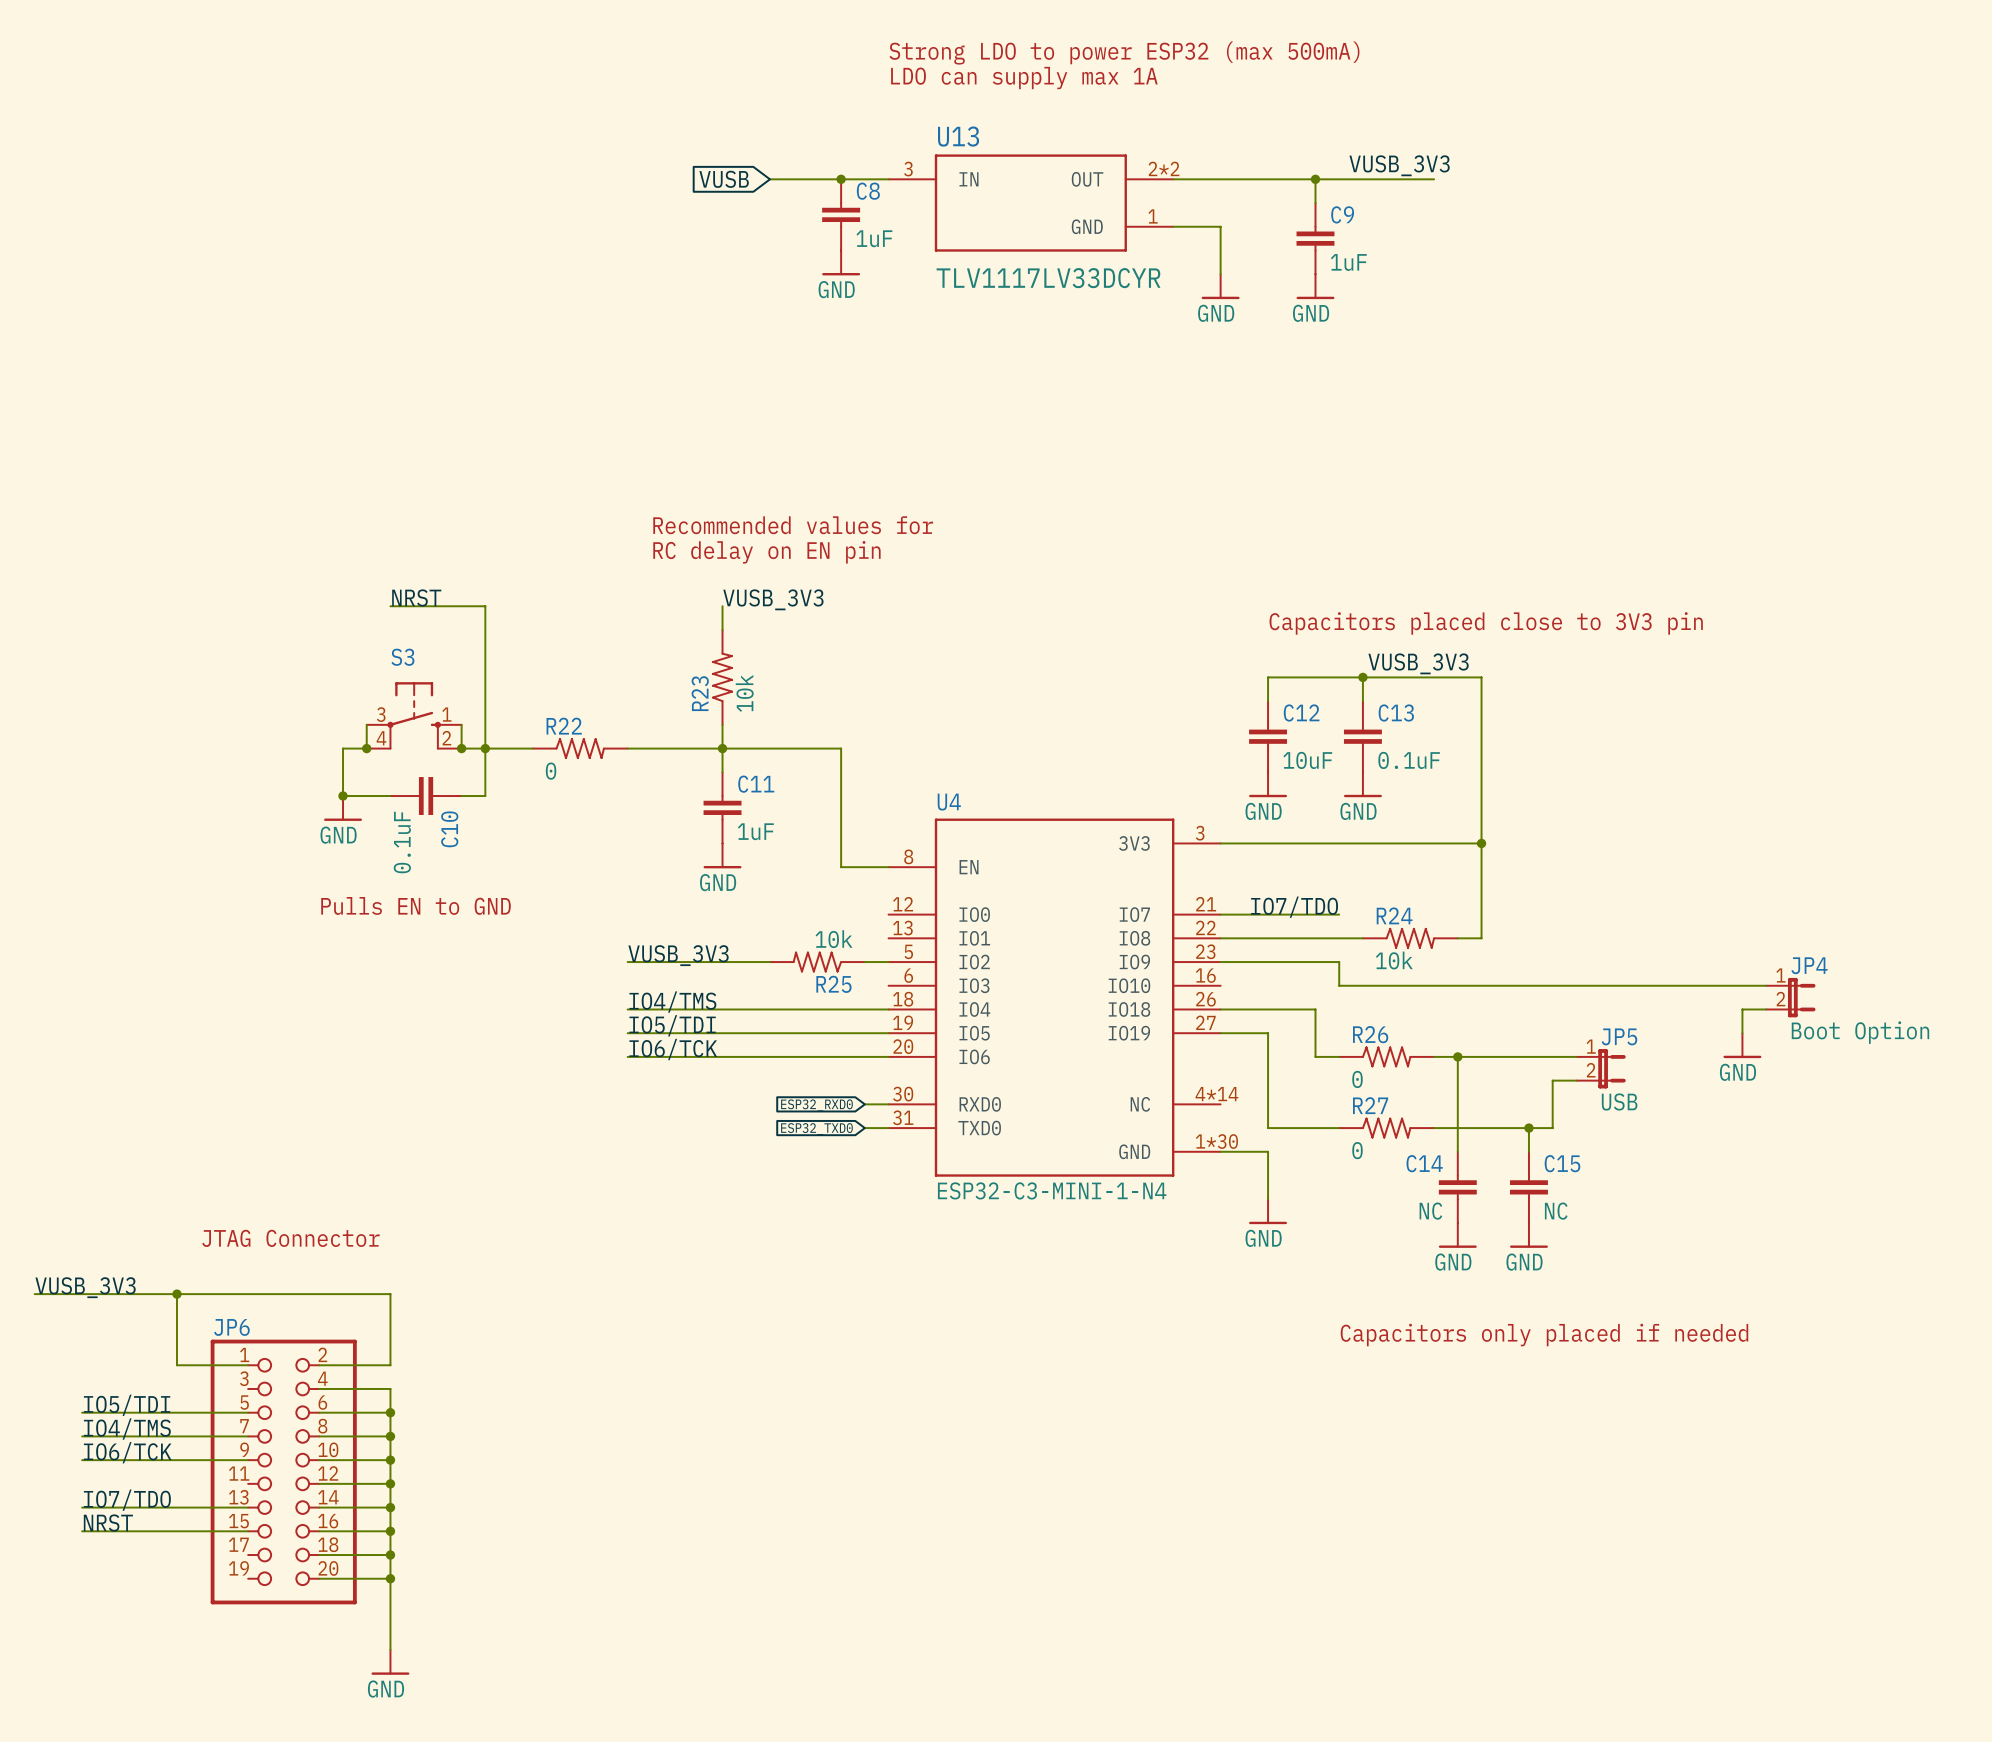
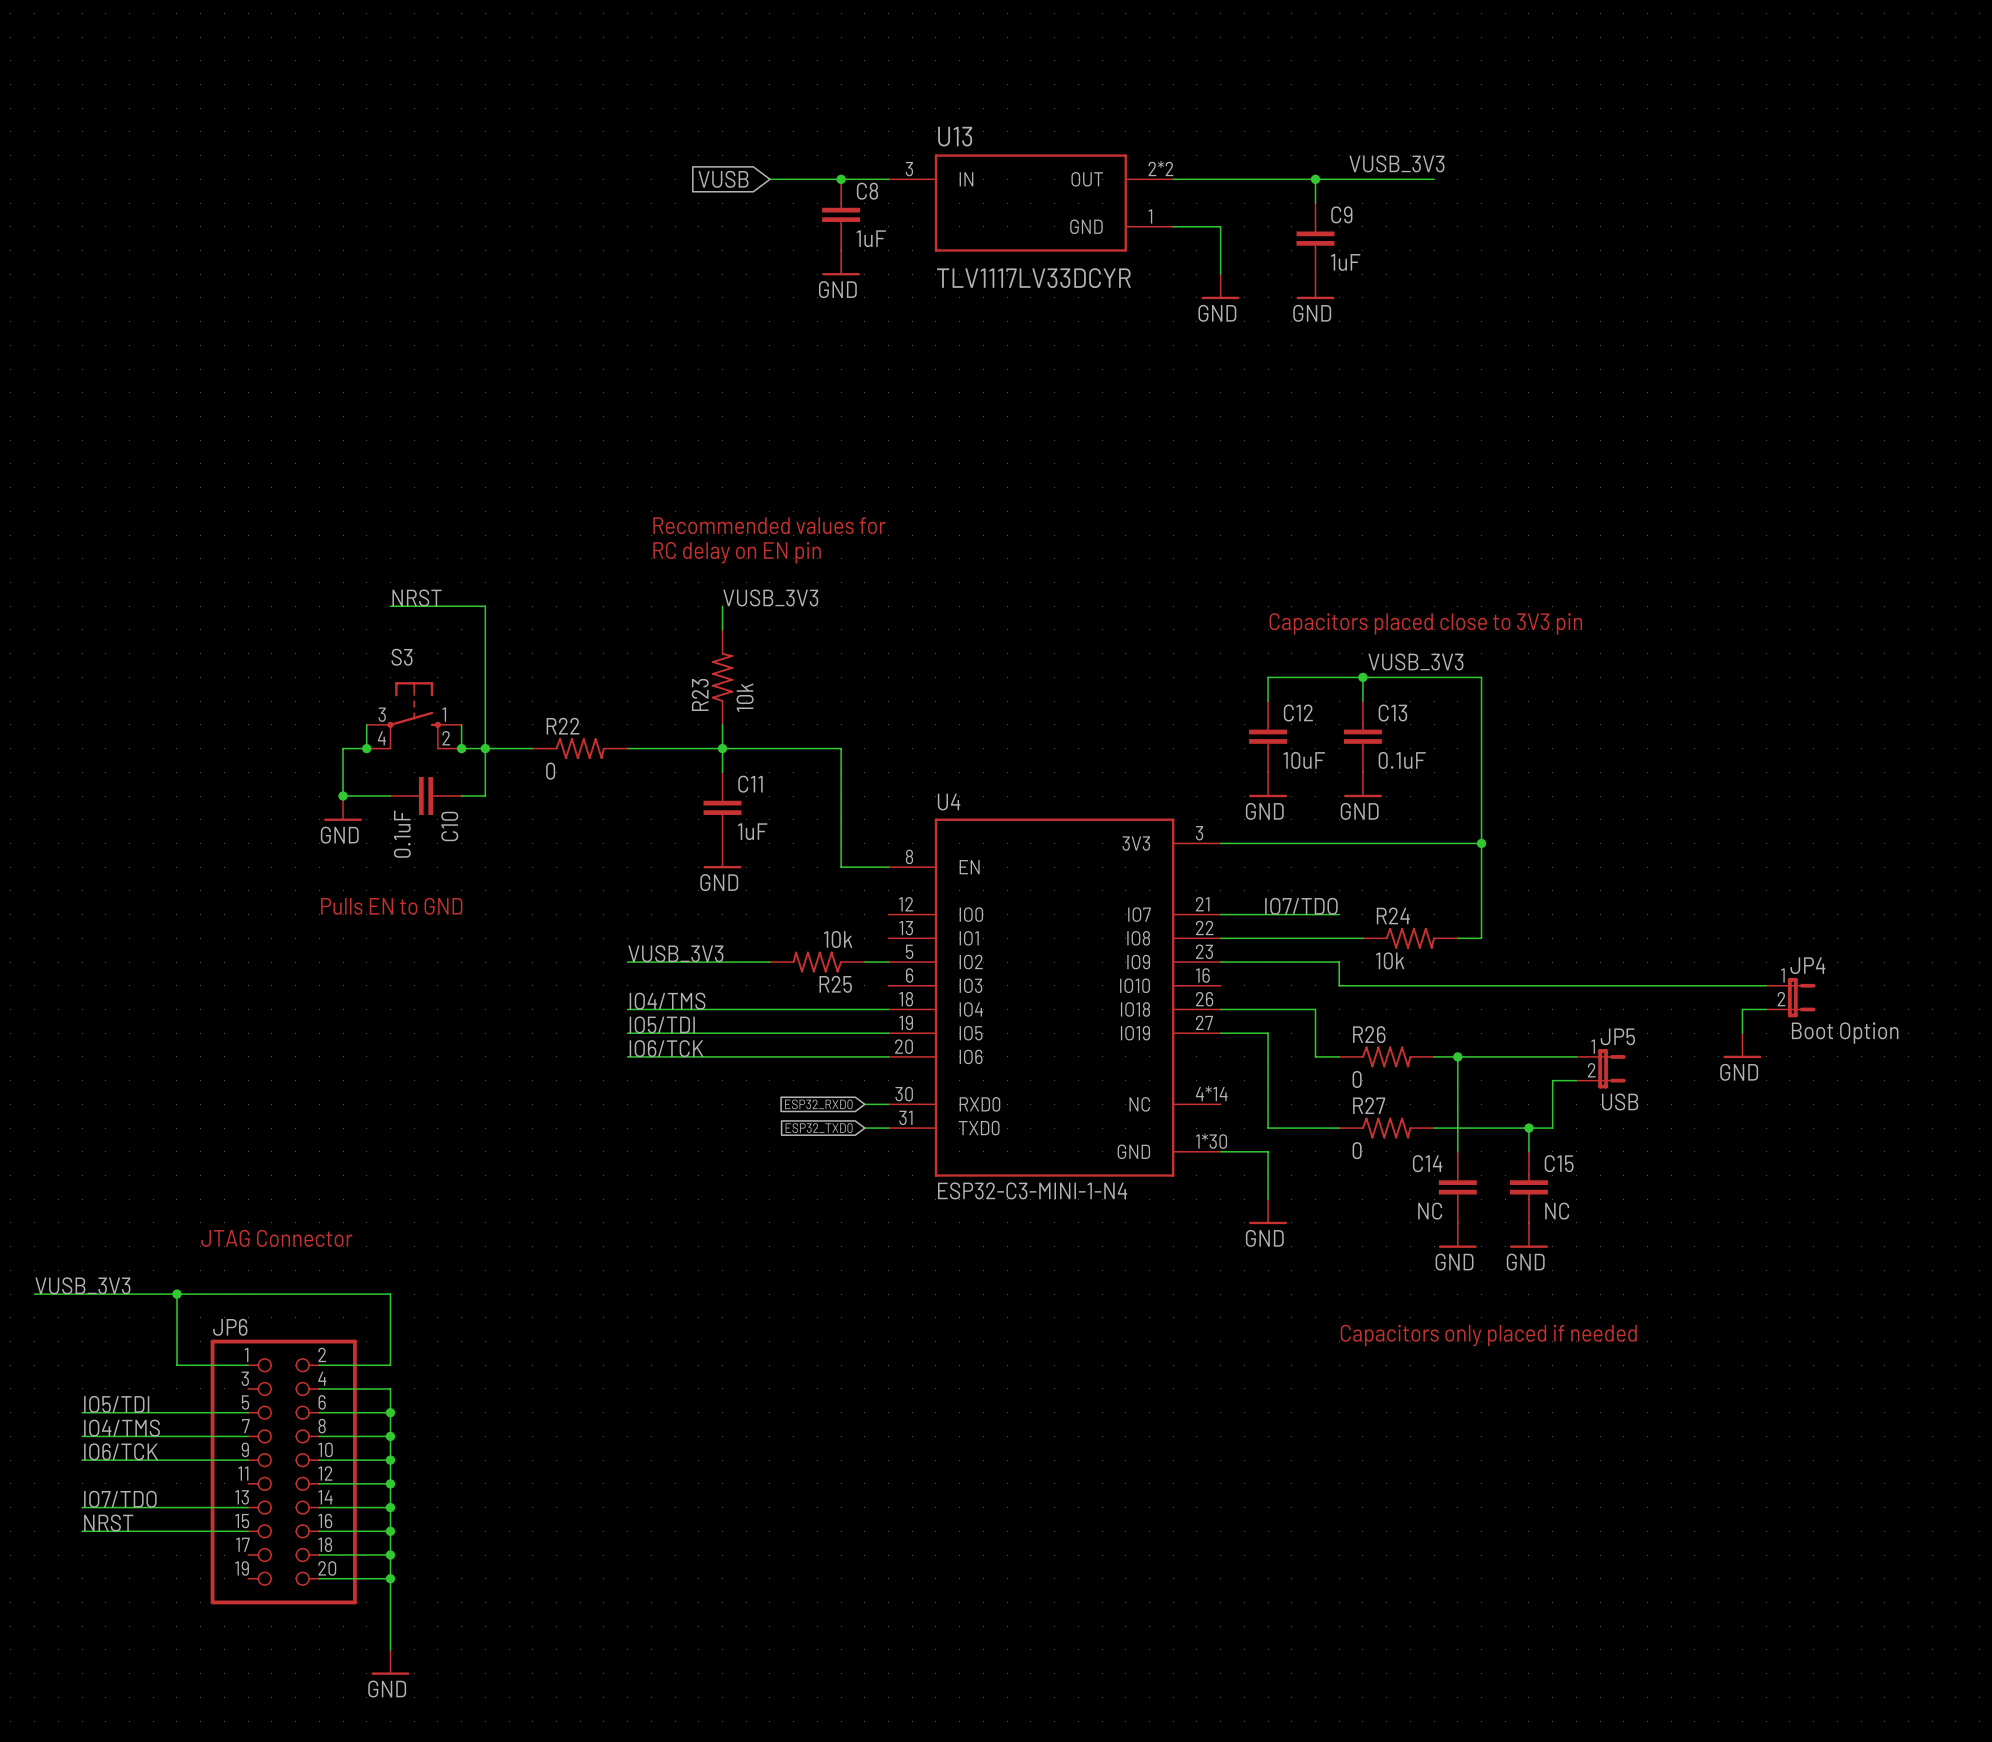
text: Strong LDO to power ESP32 (max 500mA) (1124, 53) -> none
text: LDO can supply max 1A (1024, 78) -> none

